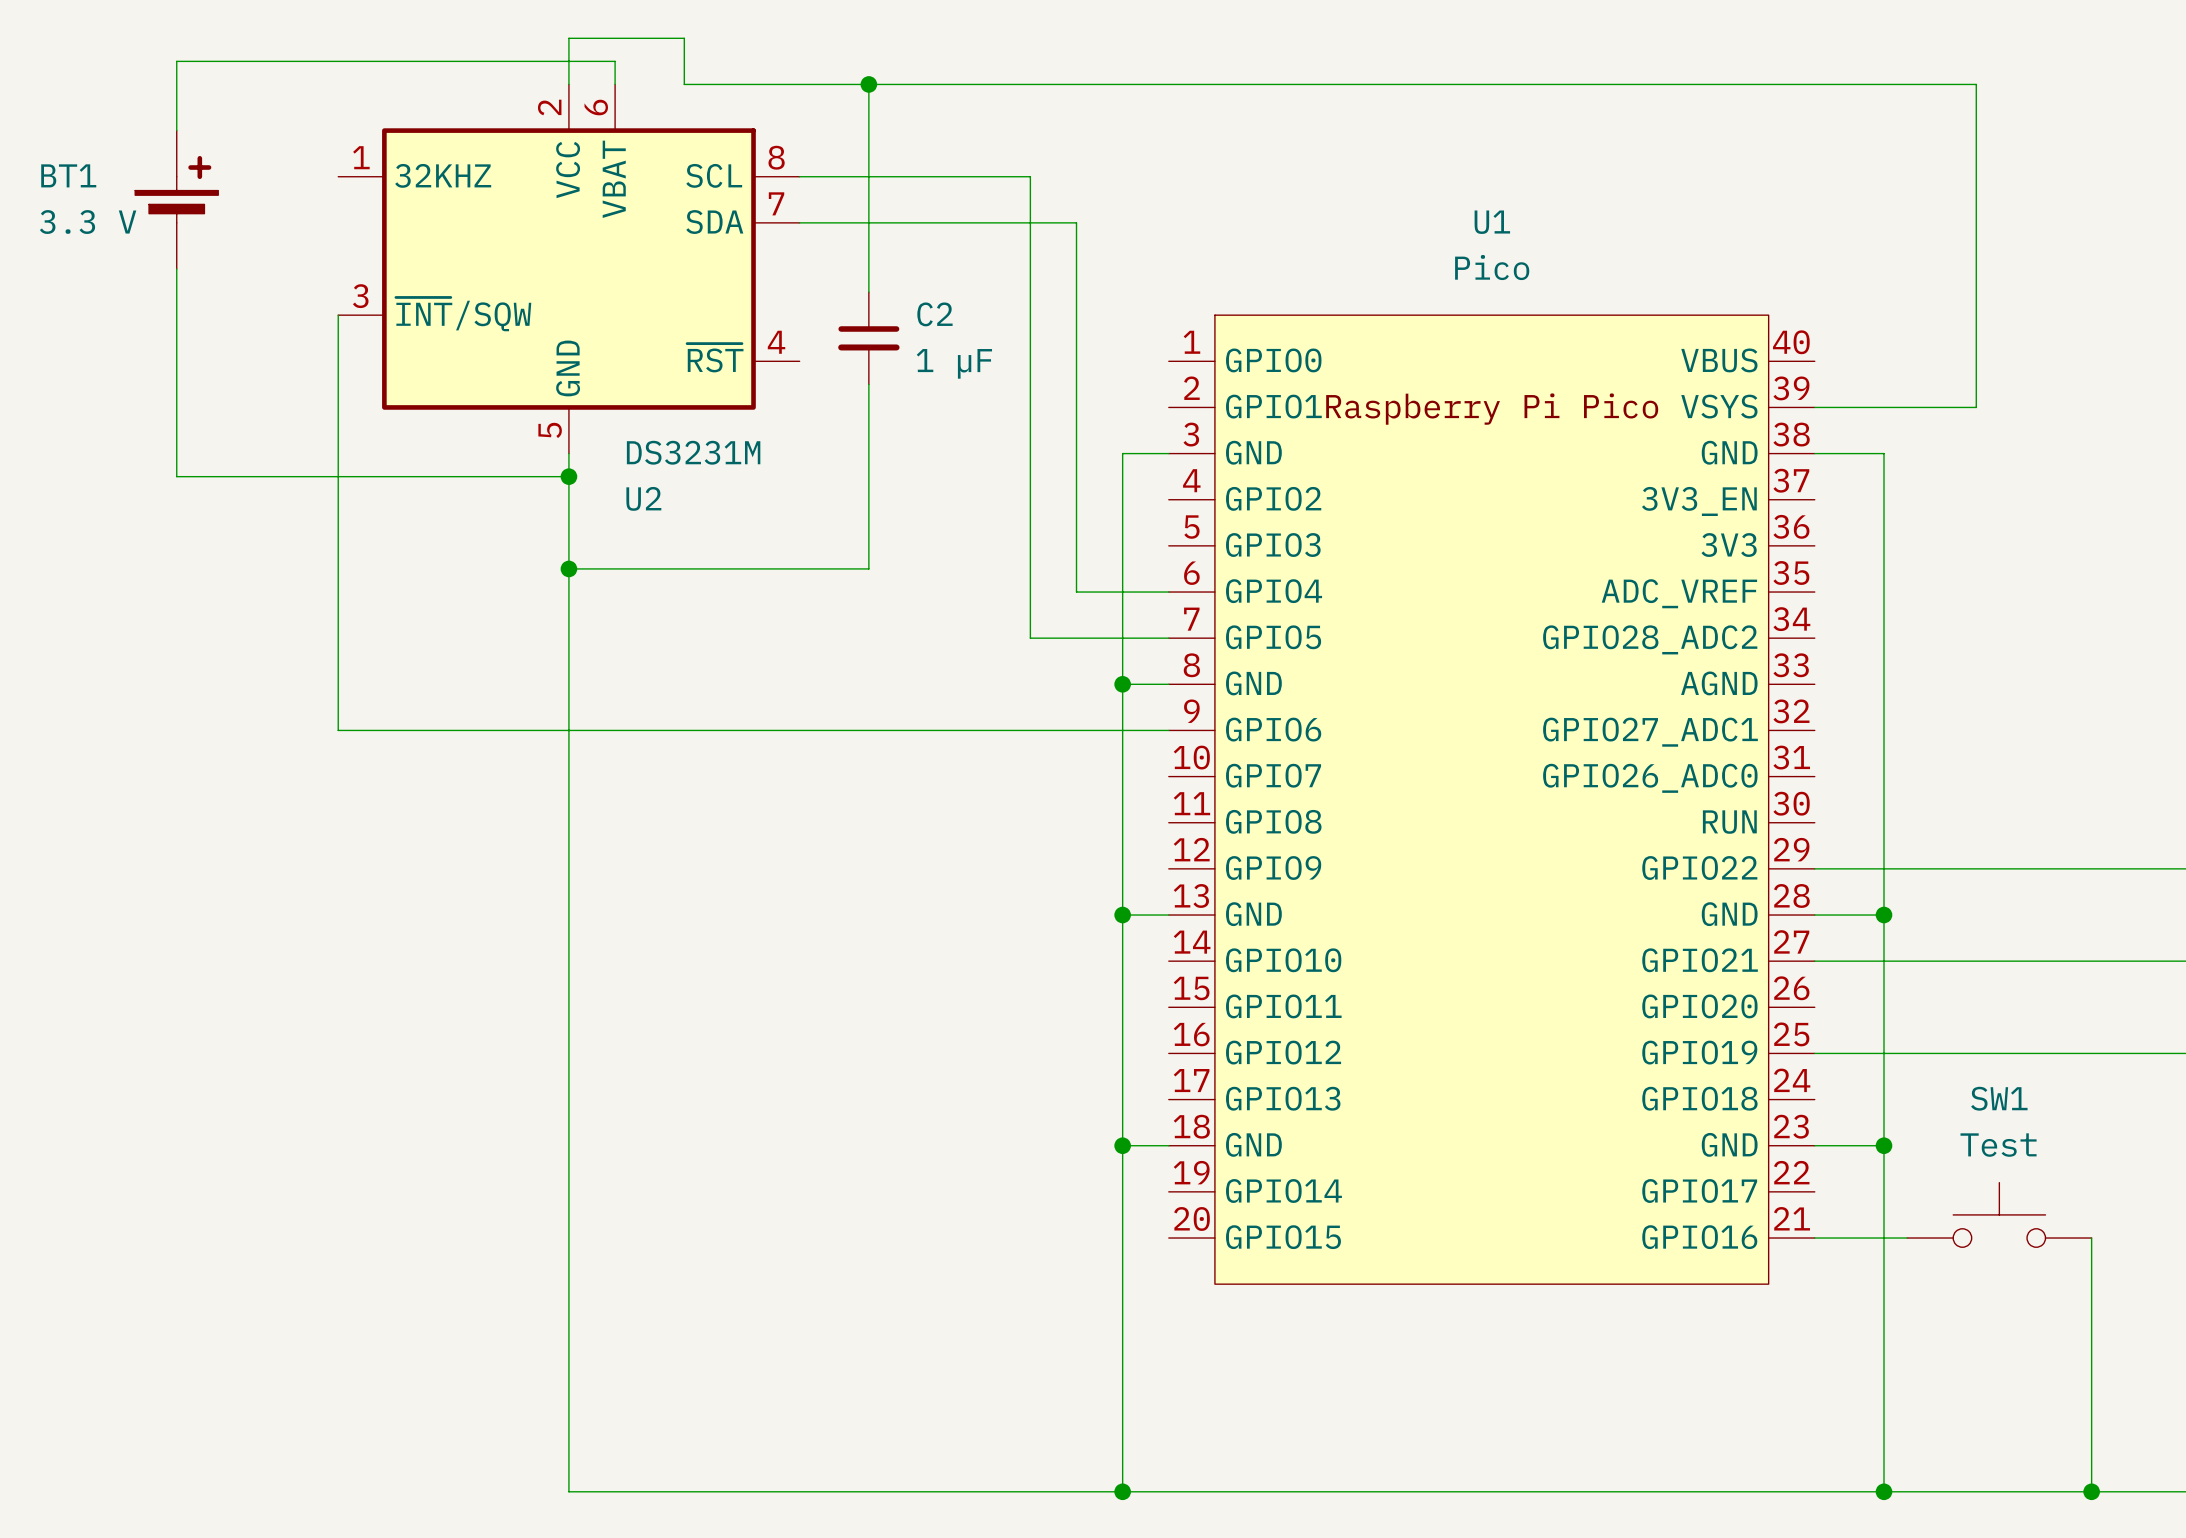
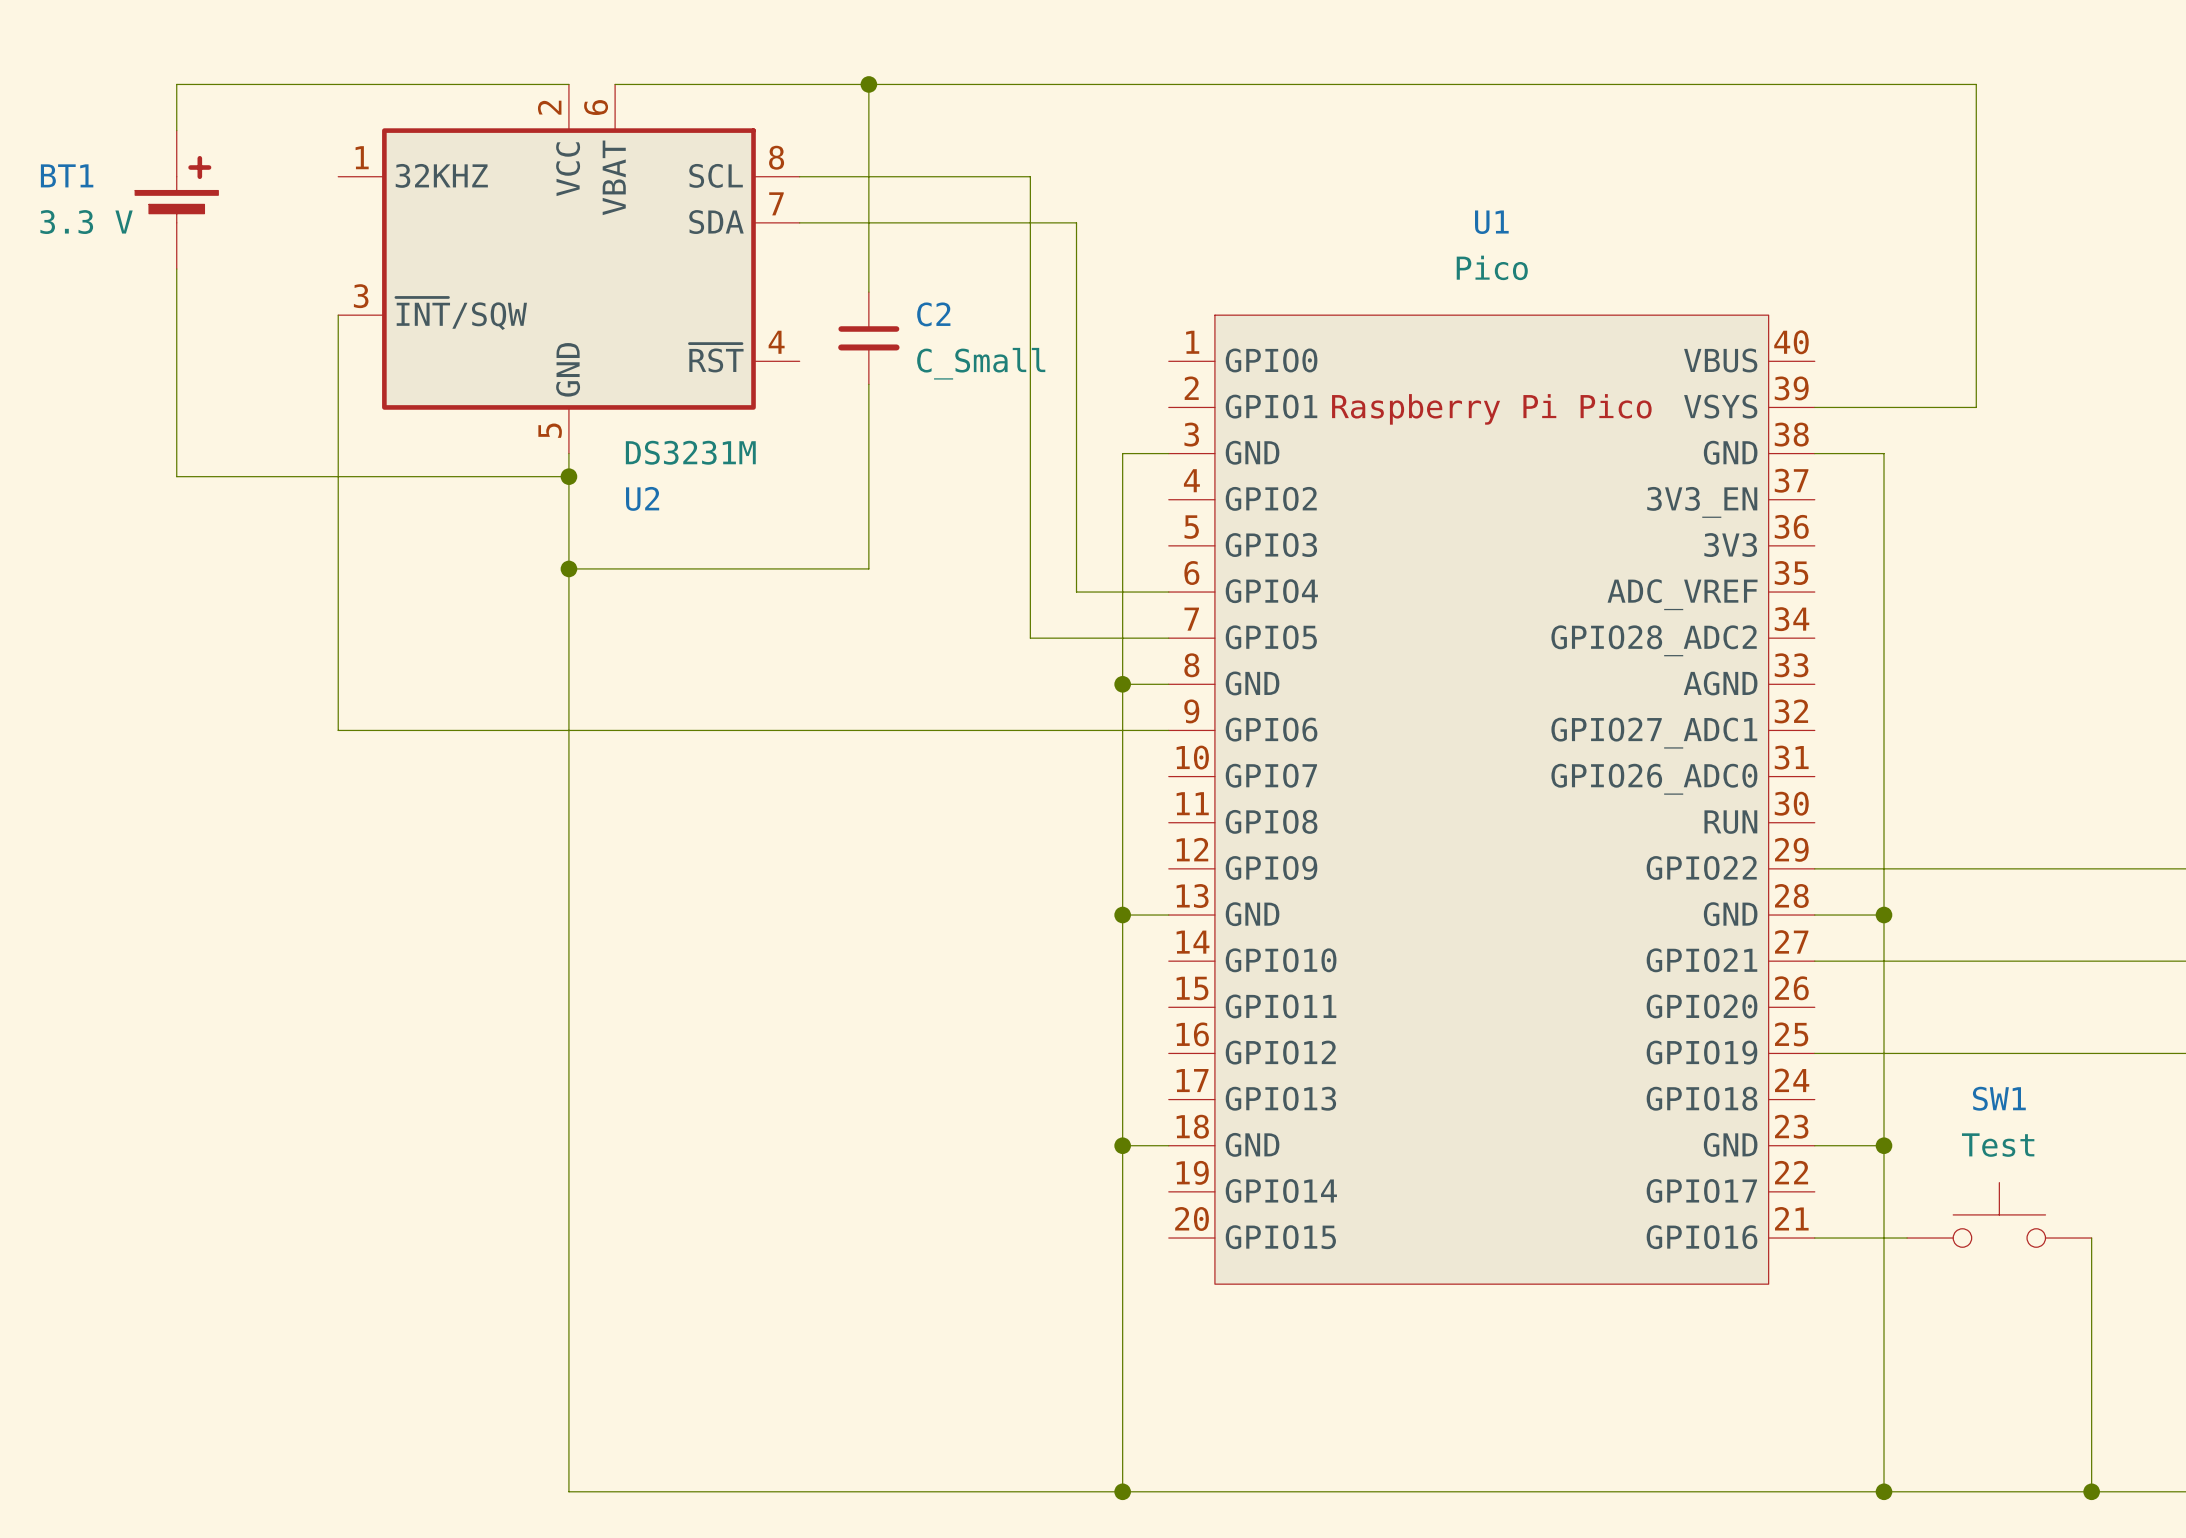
wire: (176, 84) (176, 61) (615, 61) (615, 84) -> (176, 84) (568, 84)
wire: (568, 84) (568, 38) (684, 38) (684, 84) -> (615, 84) (684, 84)
C2 value: 1 µF (954, 363) -> C_Small (981, 363)

